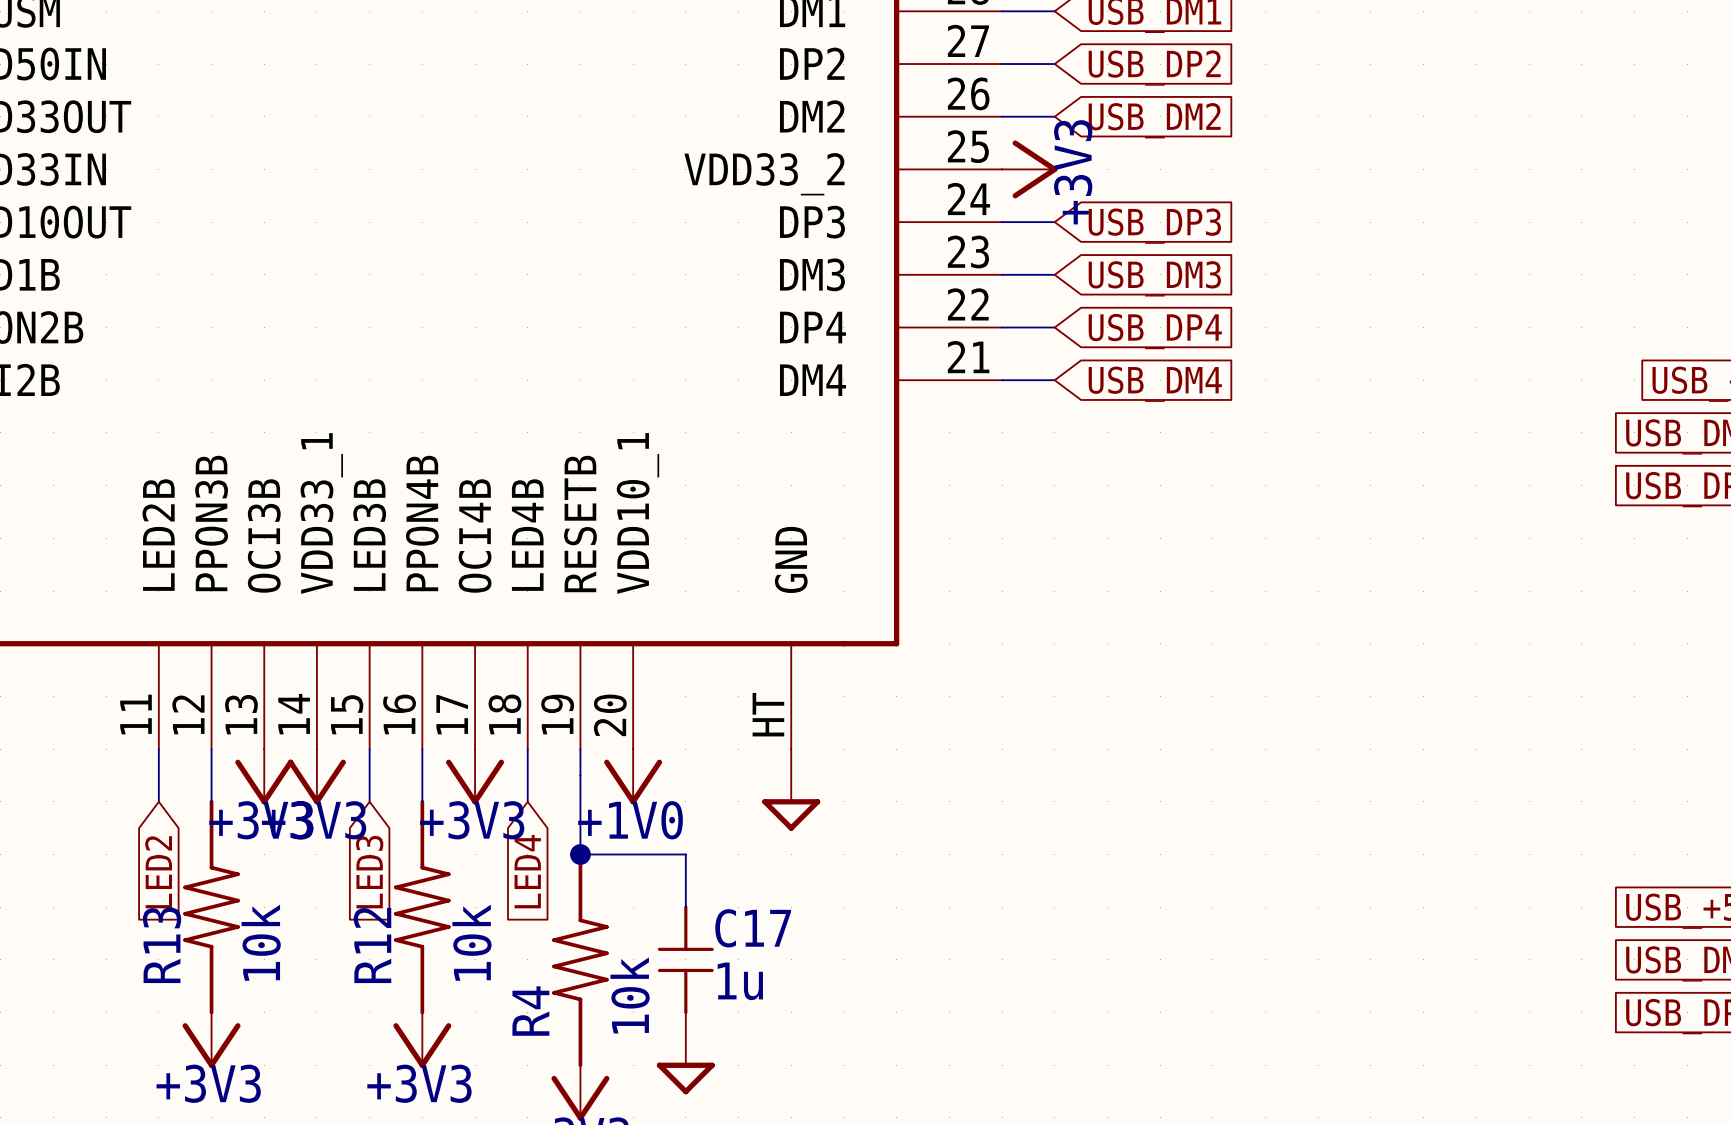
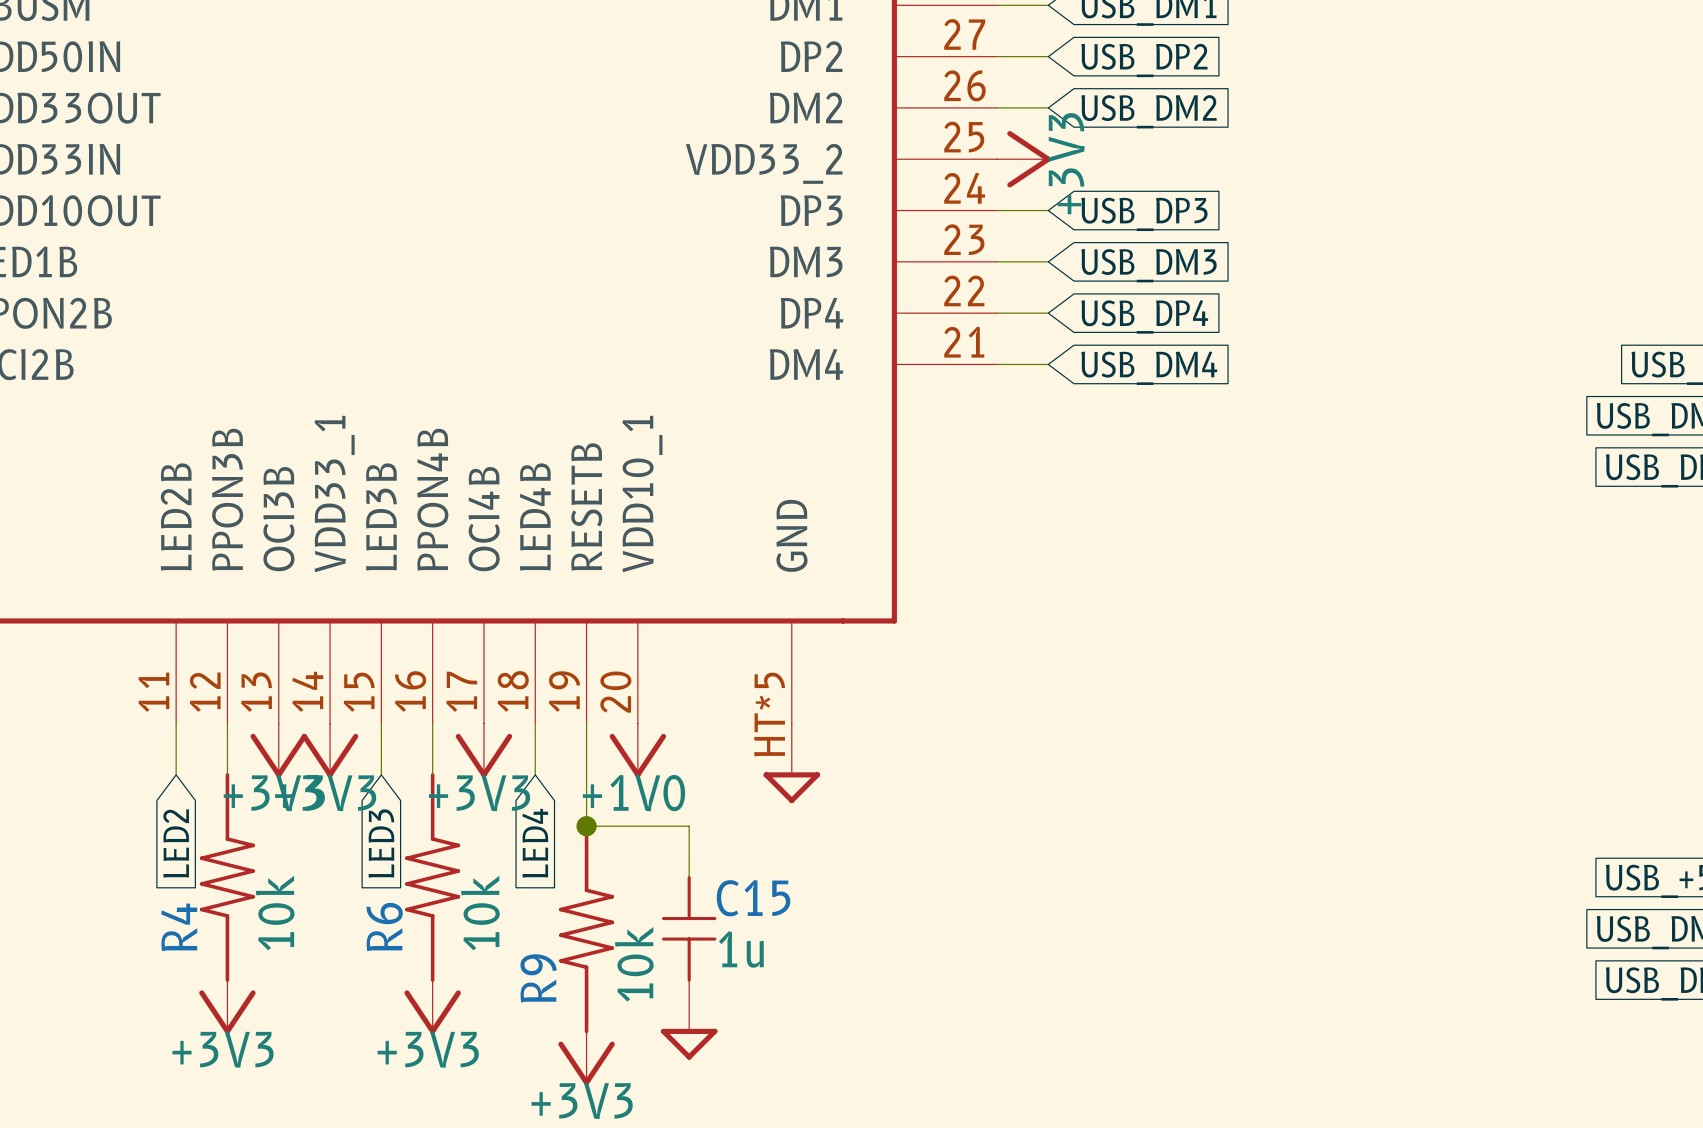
part pin number: HT (768, 714) -> HT*5 (769, 714)
C17 name: C17 (753, 928) -> C15 (753, 898)
R13 name: R13 (162, 945) -> R4 (179, 927)
R12 name: R12 (372, 945) -> R6 (384, 927)
R4 name: R4 (530, 1011) -> R9 (538, 978)

